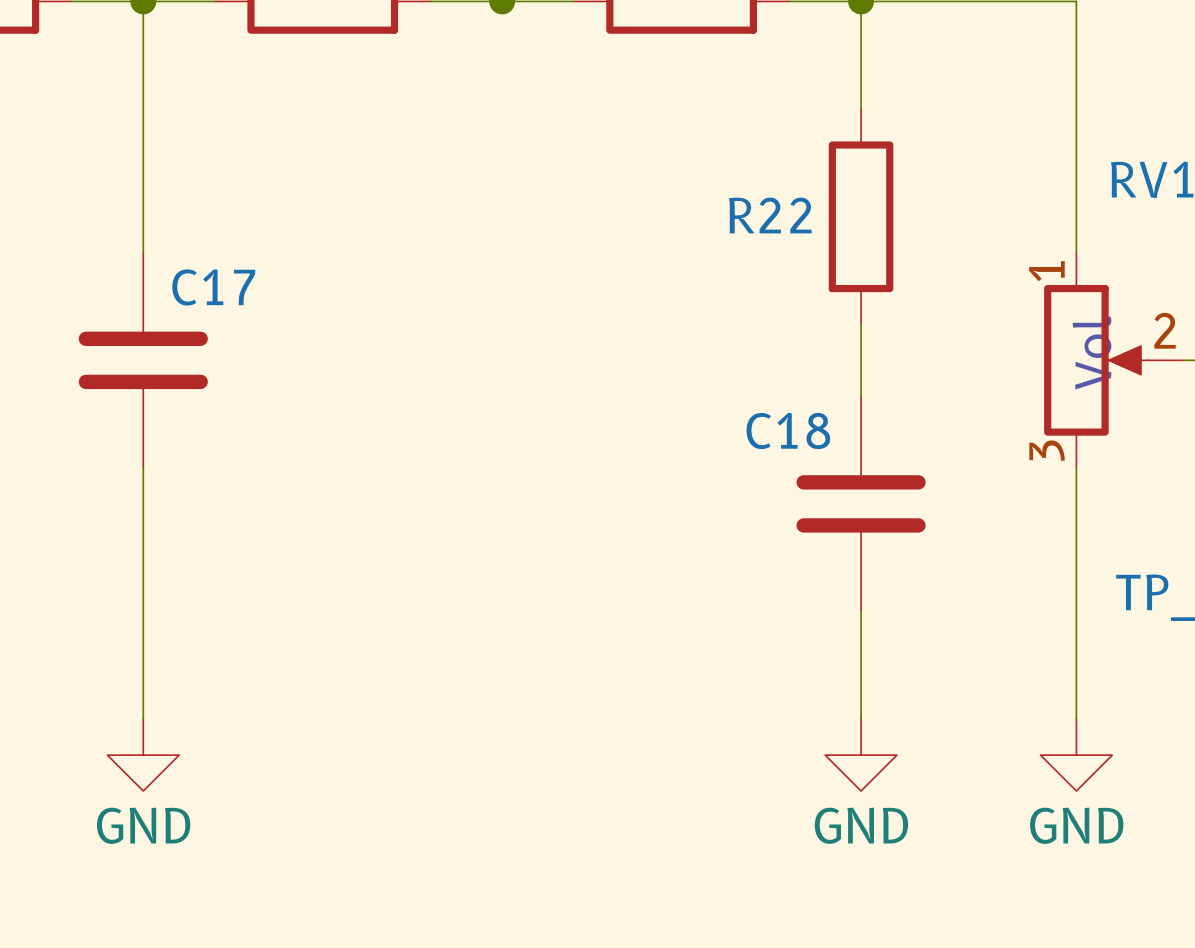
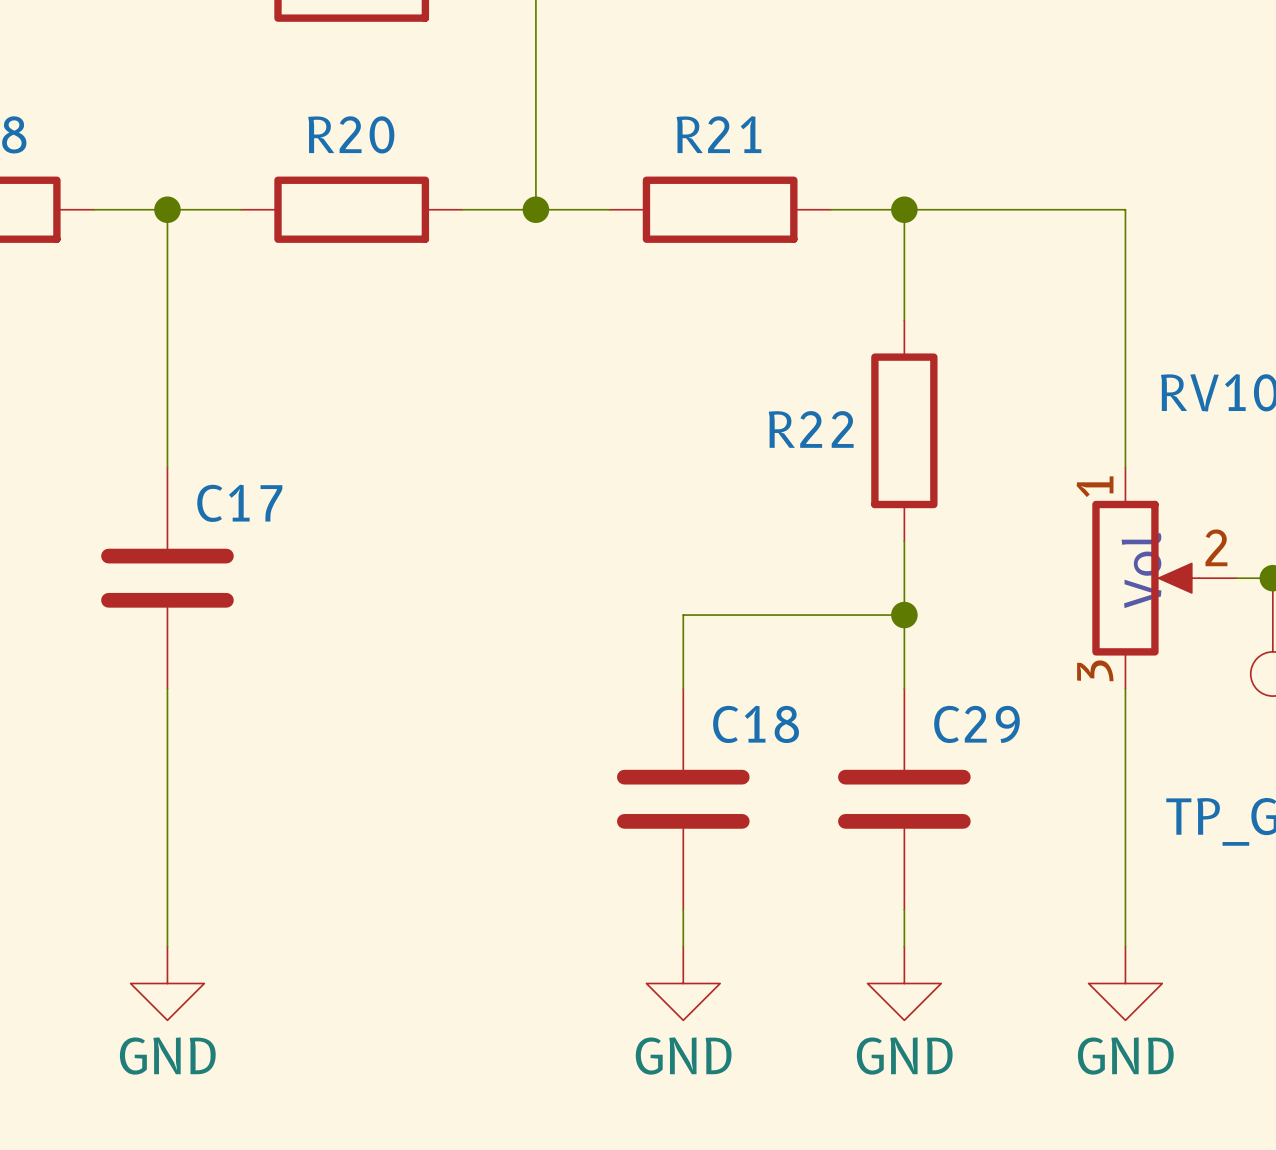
junction: none -> (904, 615)
C18 name position: C18 (788, 430) -> C18 (756, 724)
wire: none -> (683, 688) (683, 615) (904, 615) (904, 688)
C18 position: (861, 503) -> (683, 799)
C29: none -> (904, 799)
wire: none -> (683, 909) (683, 946)
power symbol: none -> GND (683, 983)

